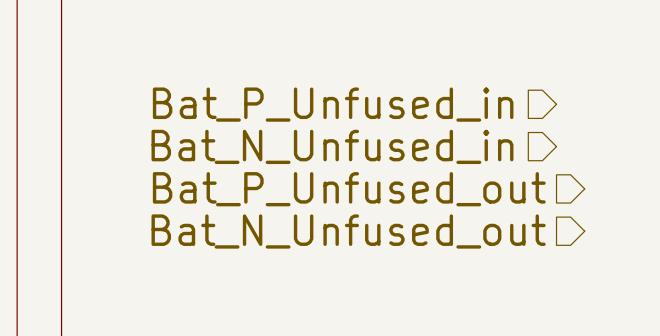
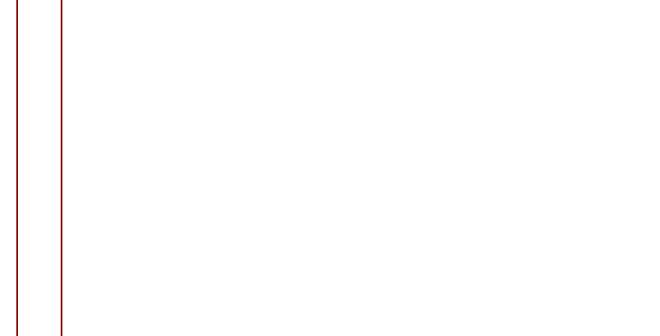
hierarchical label: Bat_P_Unfused_in (333, 104) -> none
hierarchical label: Bat_N_Unfused_in (332, 146) -> none
hierarchical label: Bat_P_Unfused_out (349, 189) -> none
hierarchical label: Bat_N_Unfused_out (348, 231) -> none

